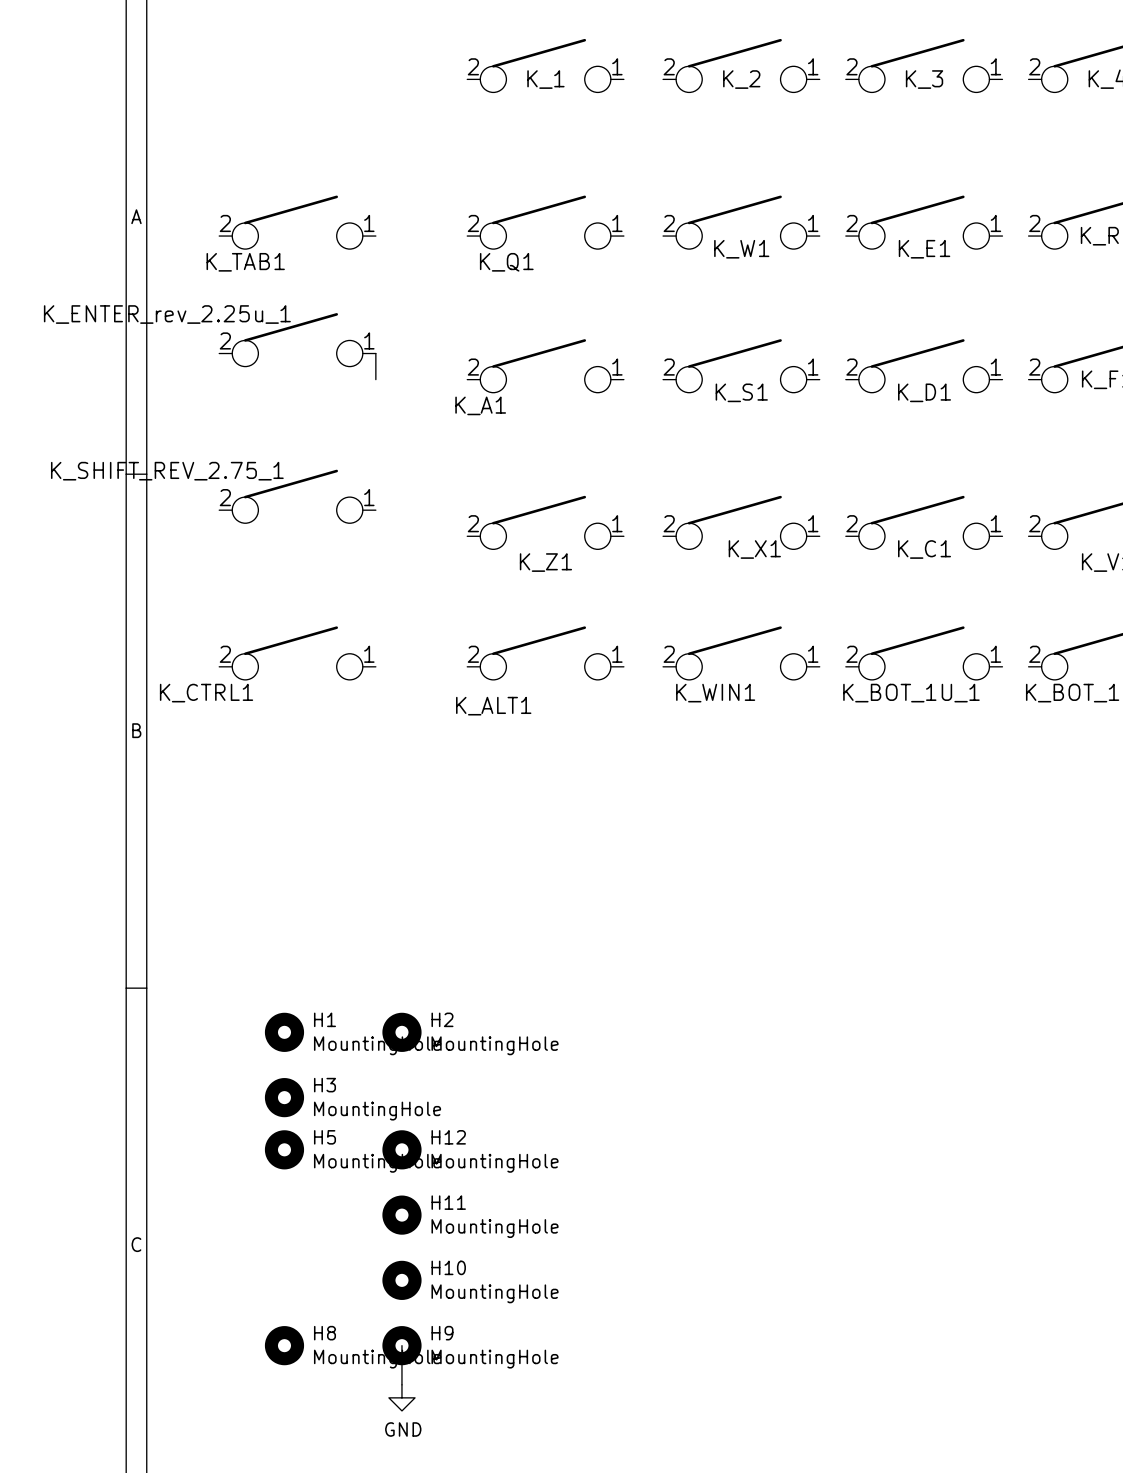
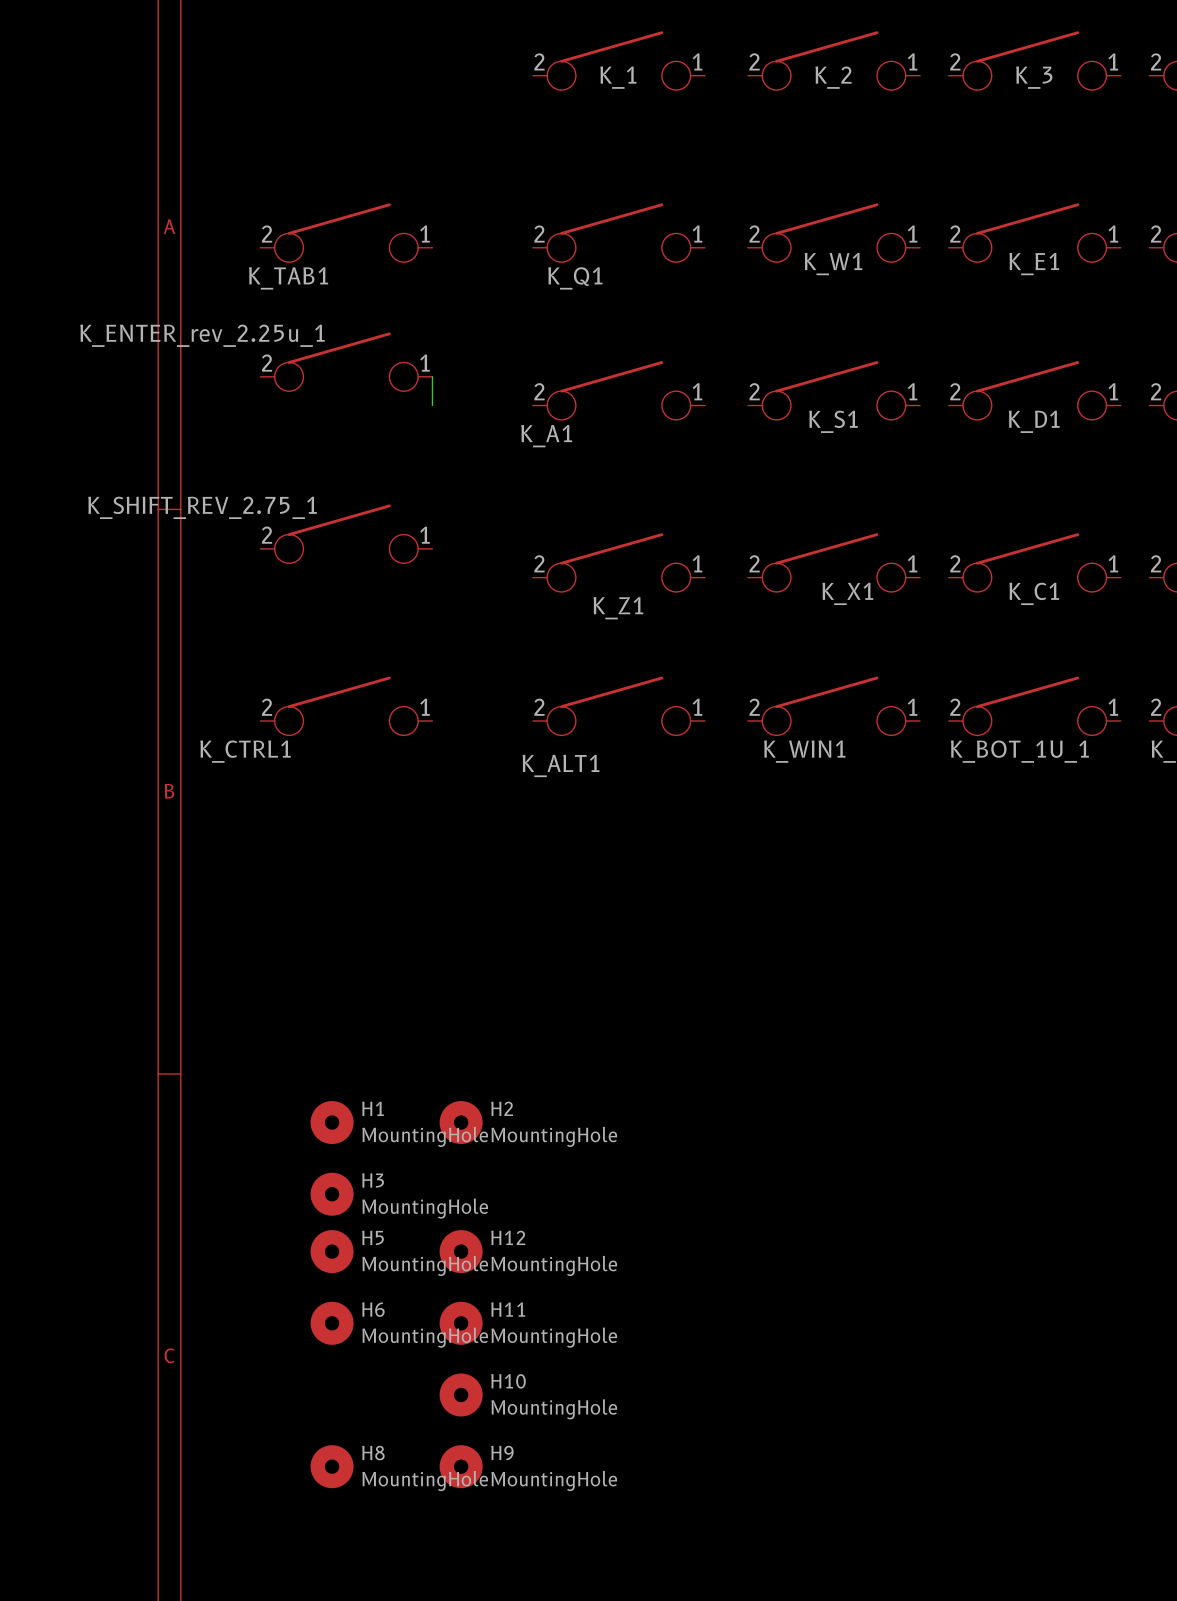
H6: none -> MountingHole (332, 1323)
wire: (401, 1345) (401, 1384) -> none
power symbol: GND (401, 1397) -> none

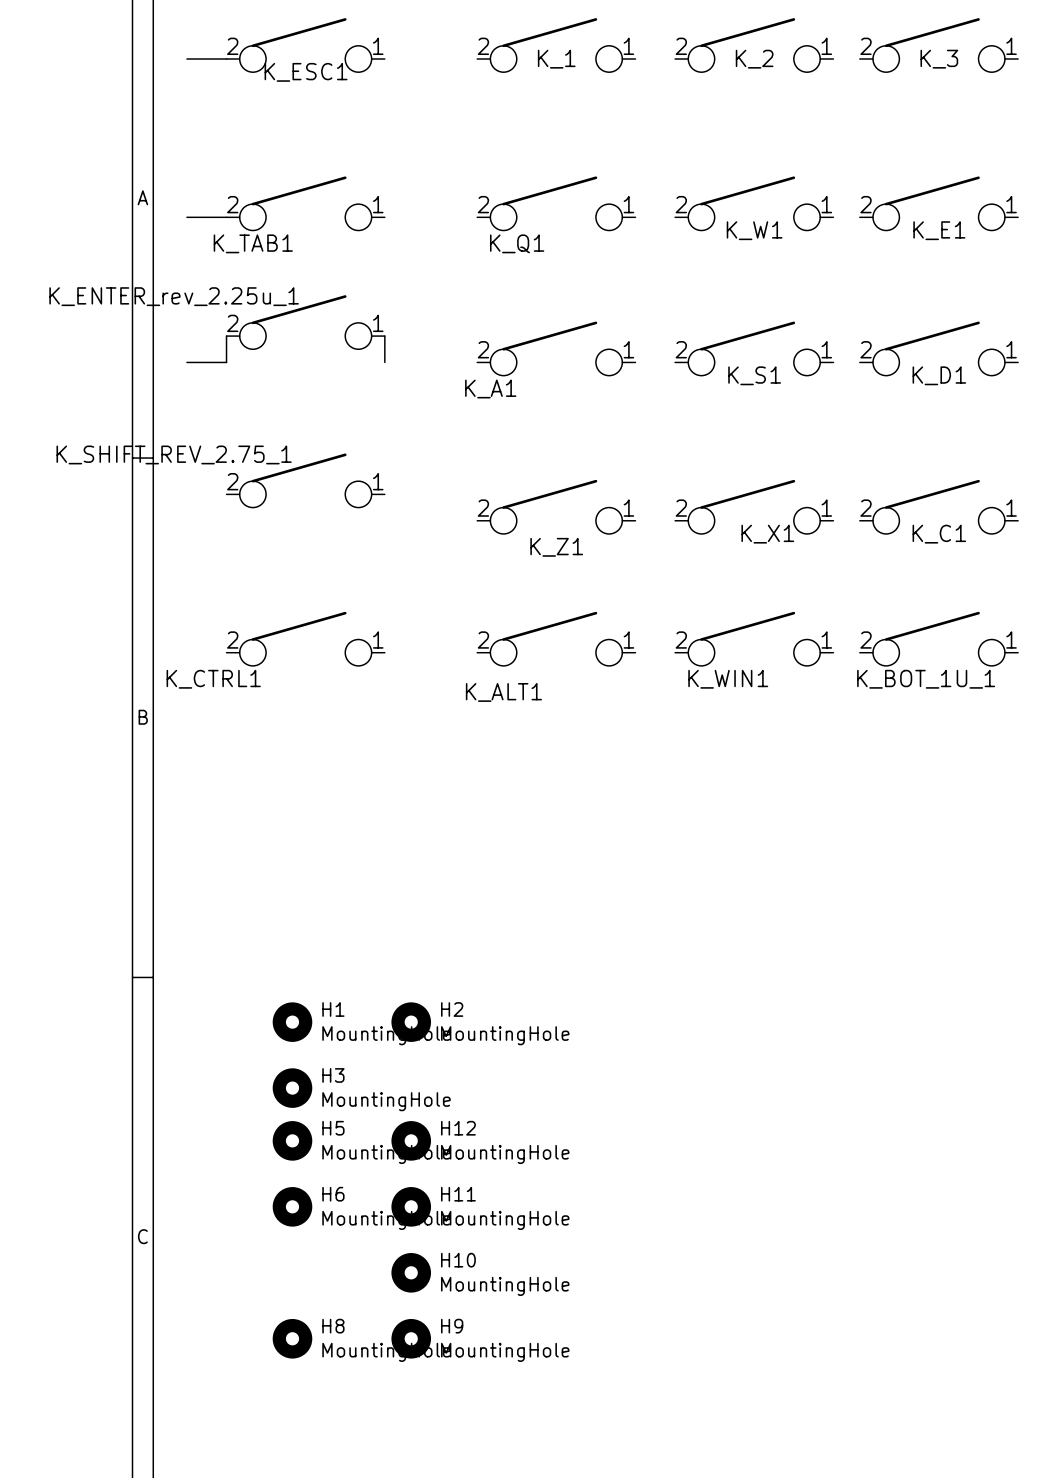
K_ESC1: none -> (305, 45)
wire: none -> (186, 59) (226, 59)
wire: none -> (186, 217) (226, 217)
wire: none -> (226, 336) (226, 362) (186, 362)

